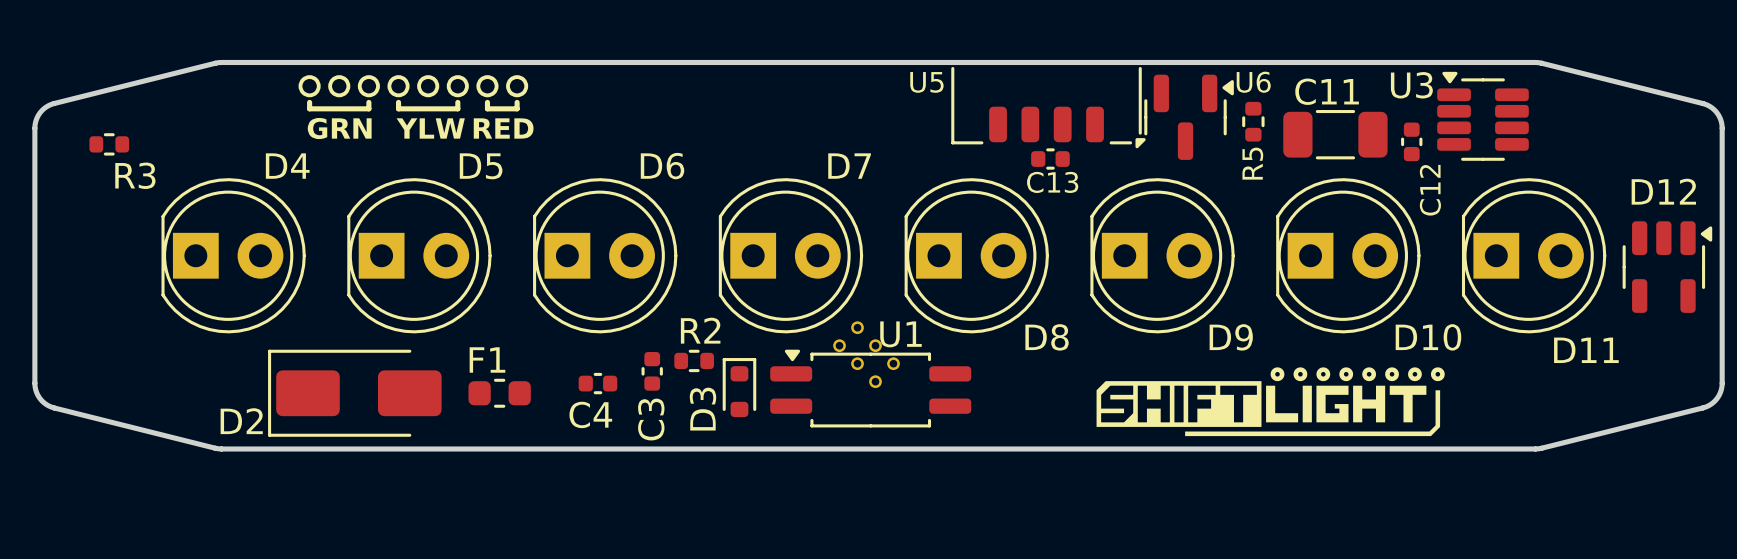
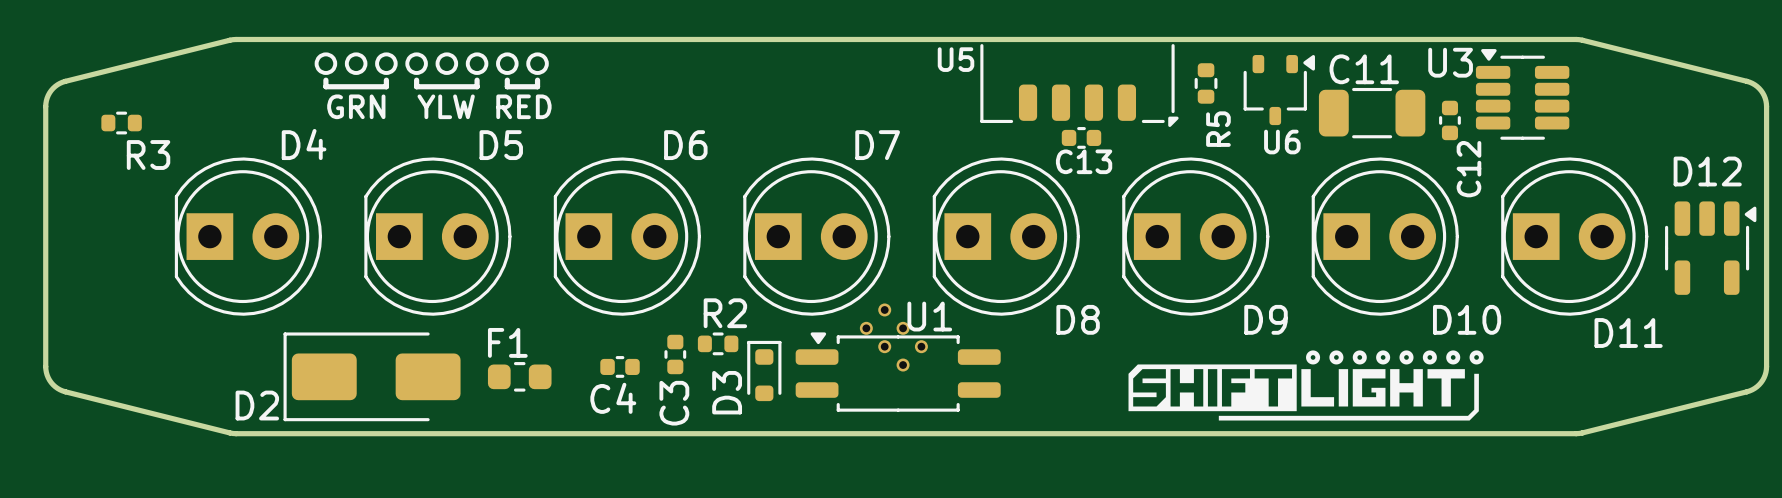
U6 footprint: [1144, 74, 1234, 160] -> [1243, 55, 1315, 126]
U6 name position: U6 (1253, 82) -> U6 (1282, 142)
R5 position: (1253, 121) -> (1206, 83)
R5 name position: R5 (1252, 163) -> R5 (1218, 129)

